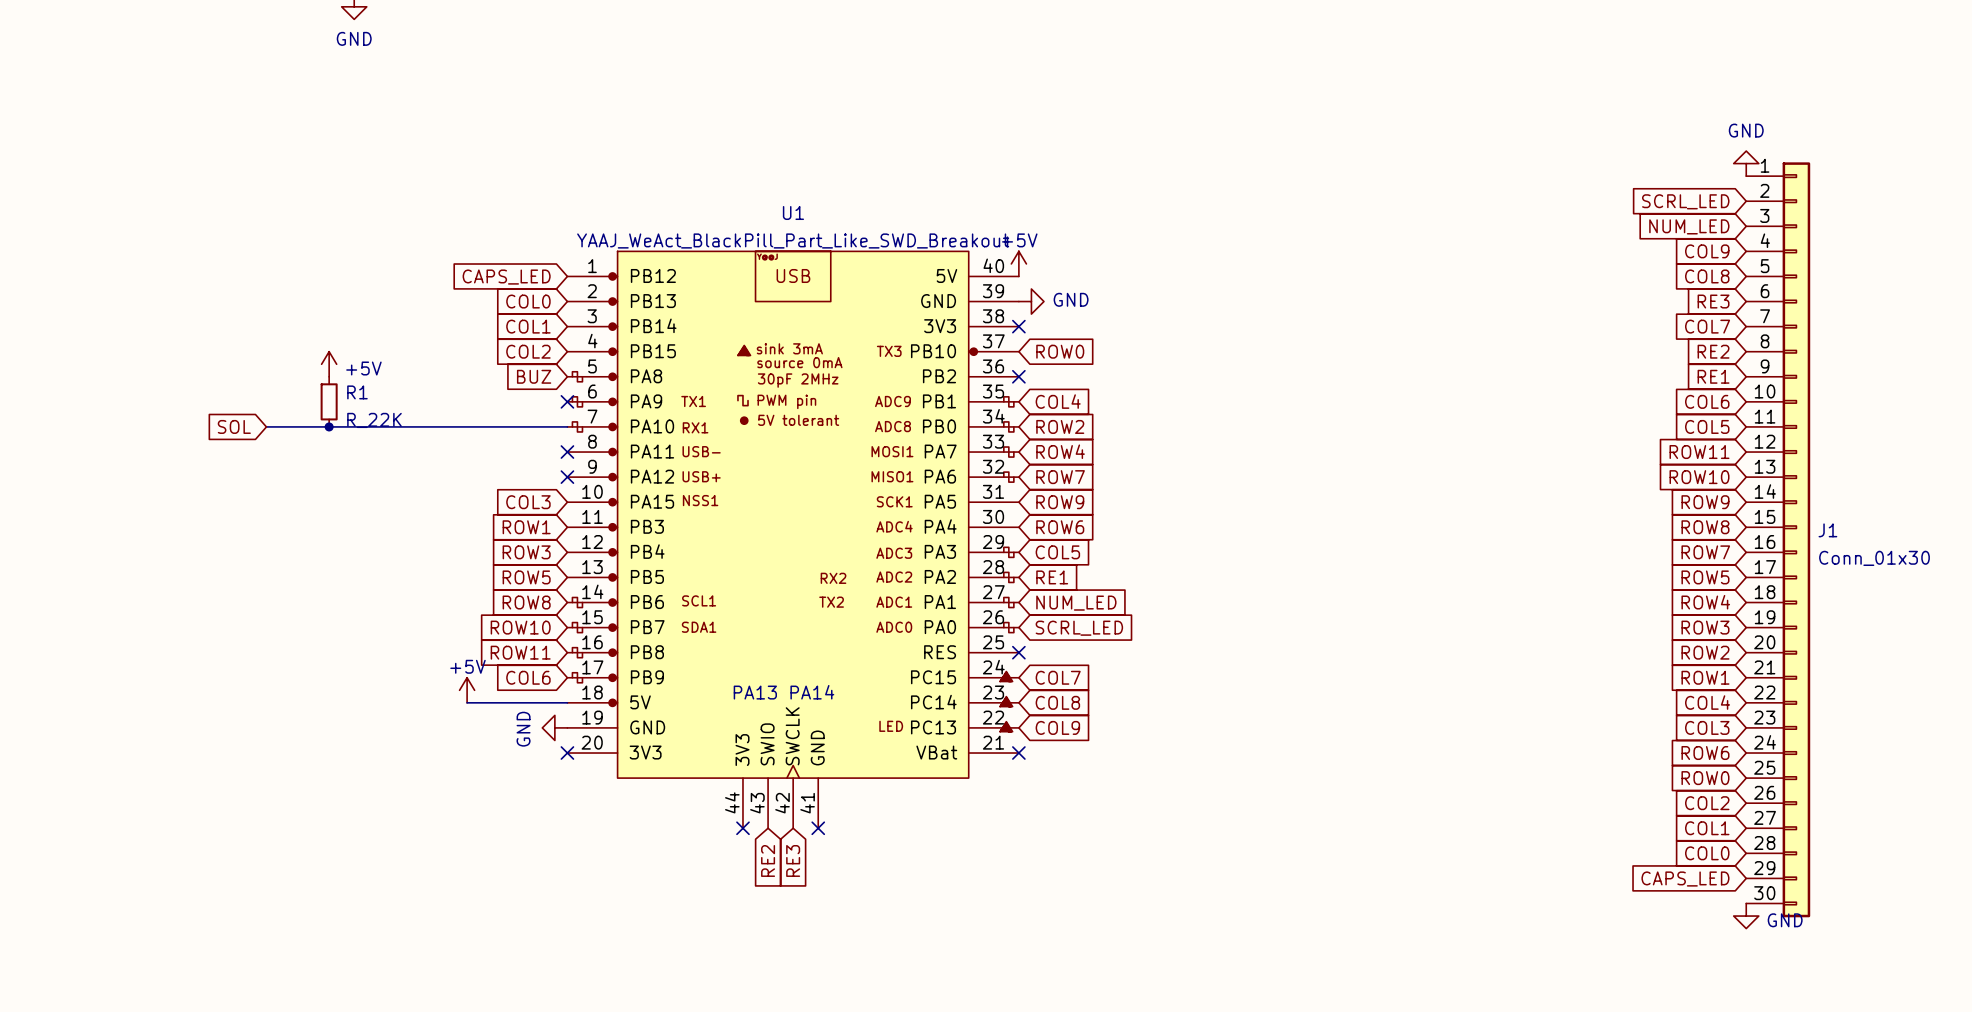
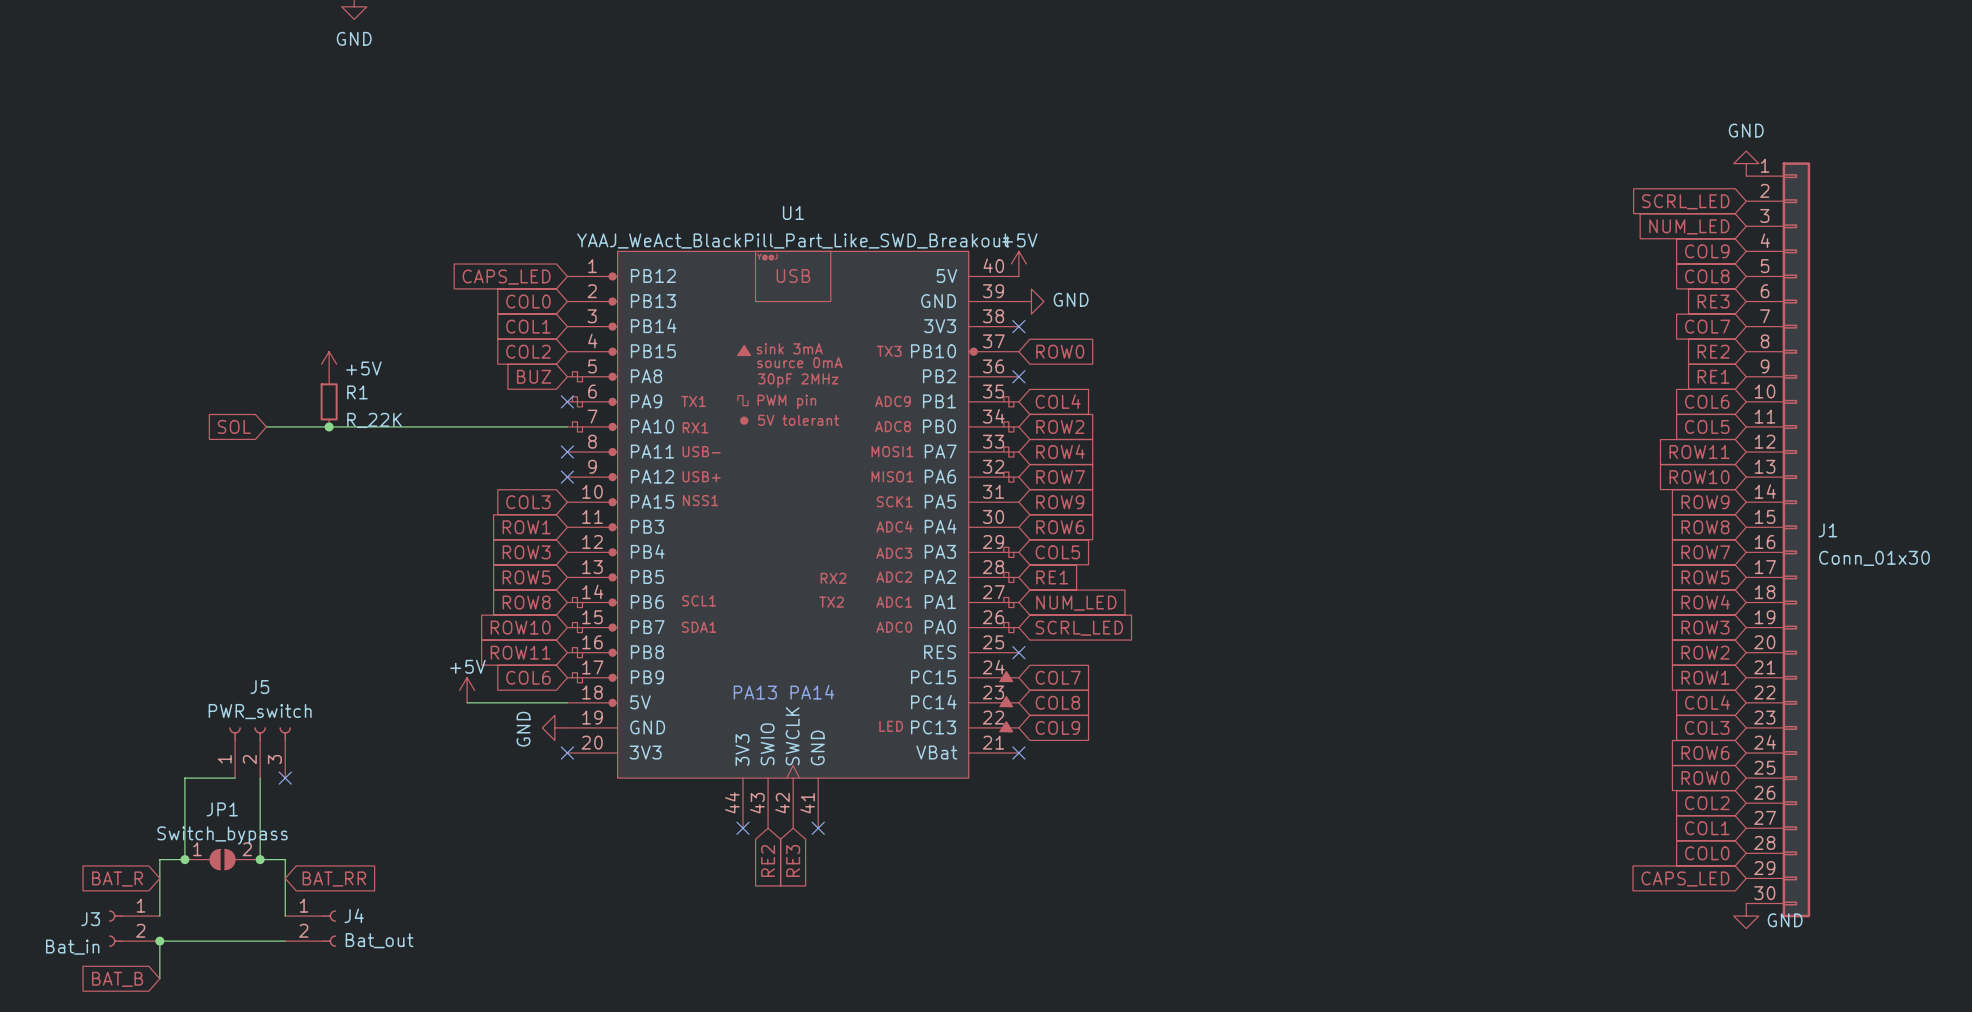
J5: none -> PWR_switch (260, 752)
wire: none -> (235, 778) (184, 778) (184, 859) (159, 859) (159, 916)
wire: none -> (260, 778) (260, 859) (285, 859) (285, 916)
no-connect mark: none -> (285, 778)
junction: none -> (184, 859)
JP1: none -> Switch_bypass (222, 859)
junction: none -> (260, 859)
global label: none -> BAT_R (117, 879)
global label: none -> BAT_RR (334, 879)
J3: none -> Bat_in (134, 928)
J4: none -> Bat_out (310, 928)
junction: none -> (159, 941)
wire: none -> (285, 941) (159, 941) (159, 978)
global label: none -> BAT_B (117, 979)

